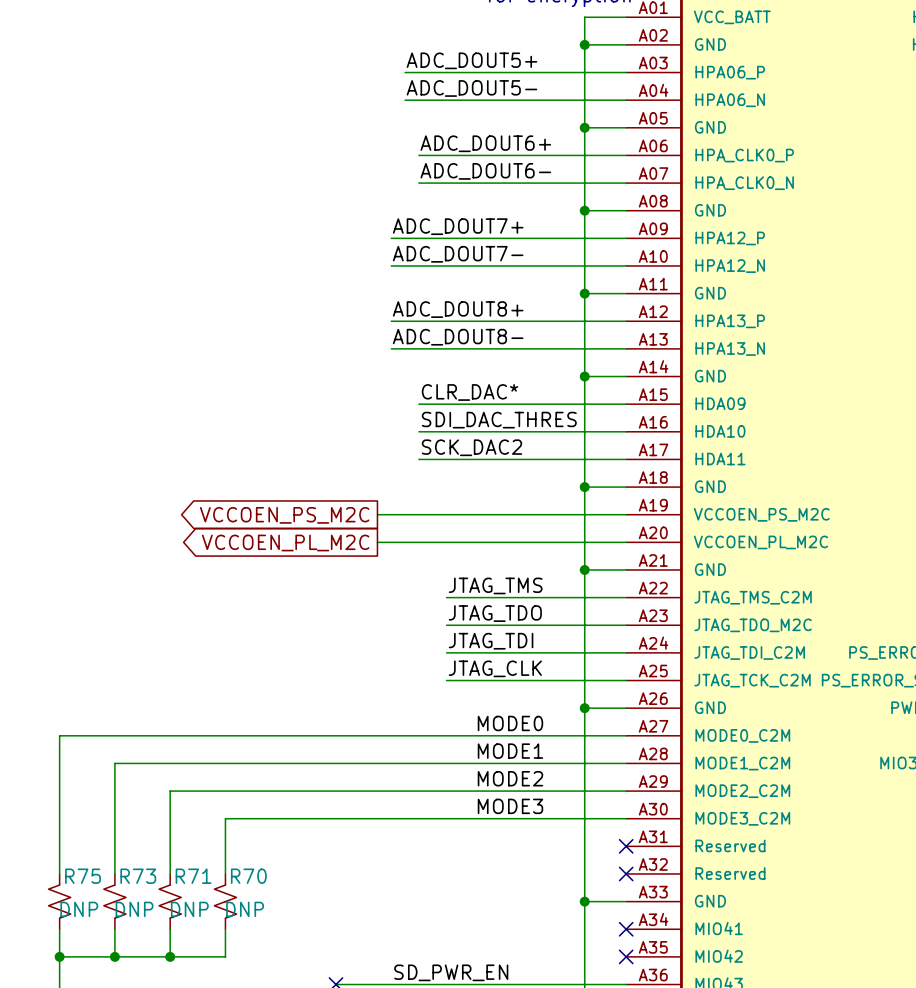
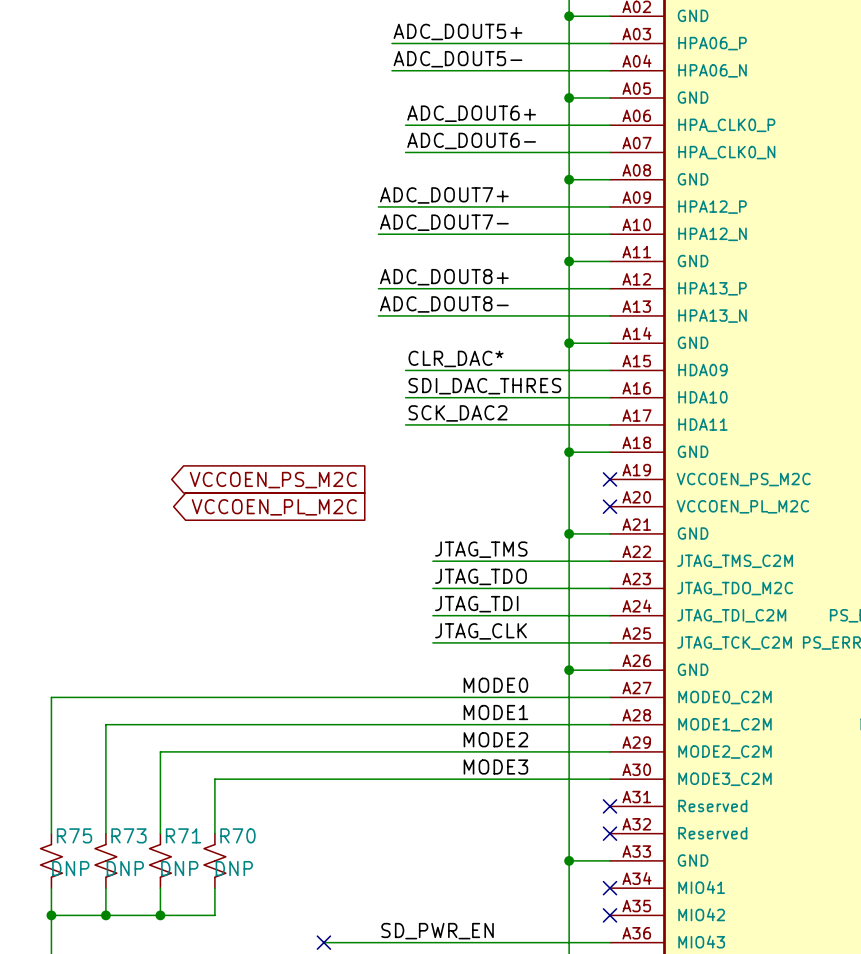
wire: (377, 514) (626, 514) -> none
no-connect mark: none -> (610, 479)
wire: (377, 542) (626, 542) -> none
no-connect mark: none -> (610, 506)

